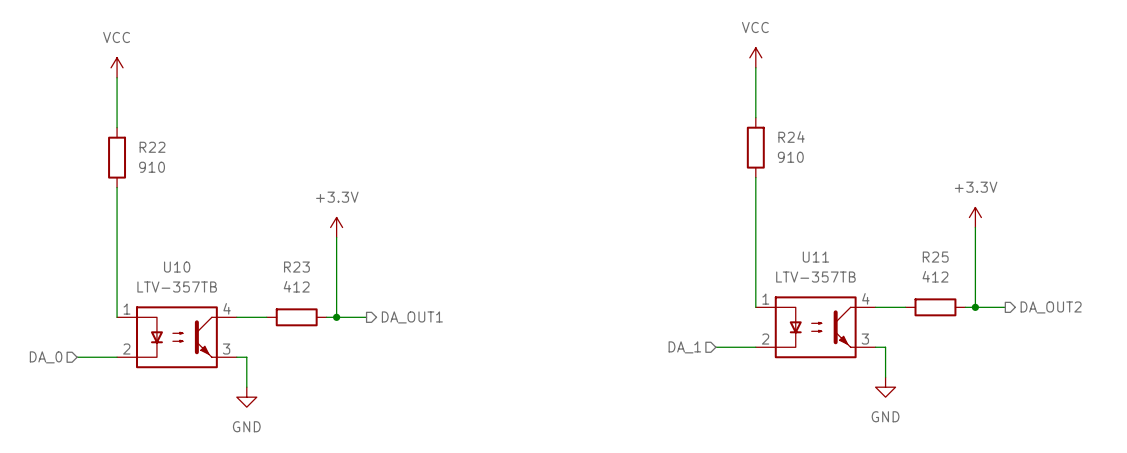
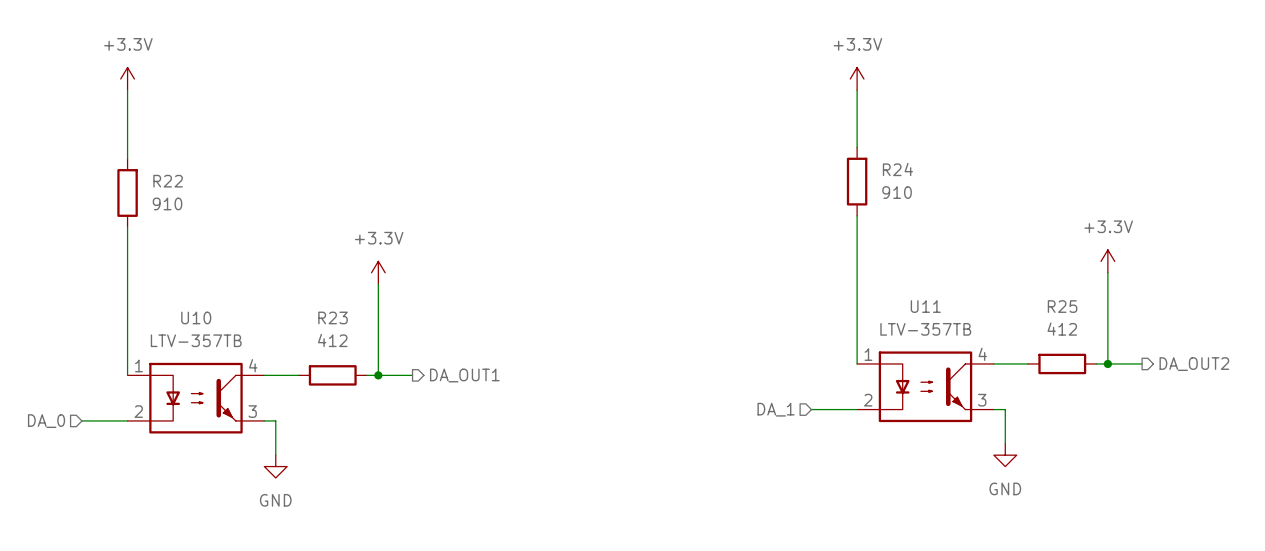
power symbol: none -> +3.3V (127, 79)
power symbol: VCC (755, 57) -> +3.3V (857, 79)
power symbol: VCC (117, 67) -> none

